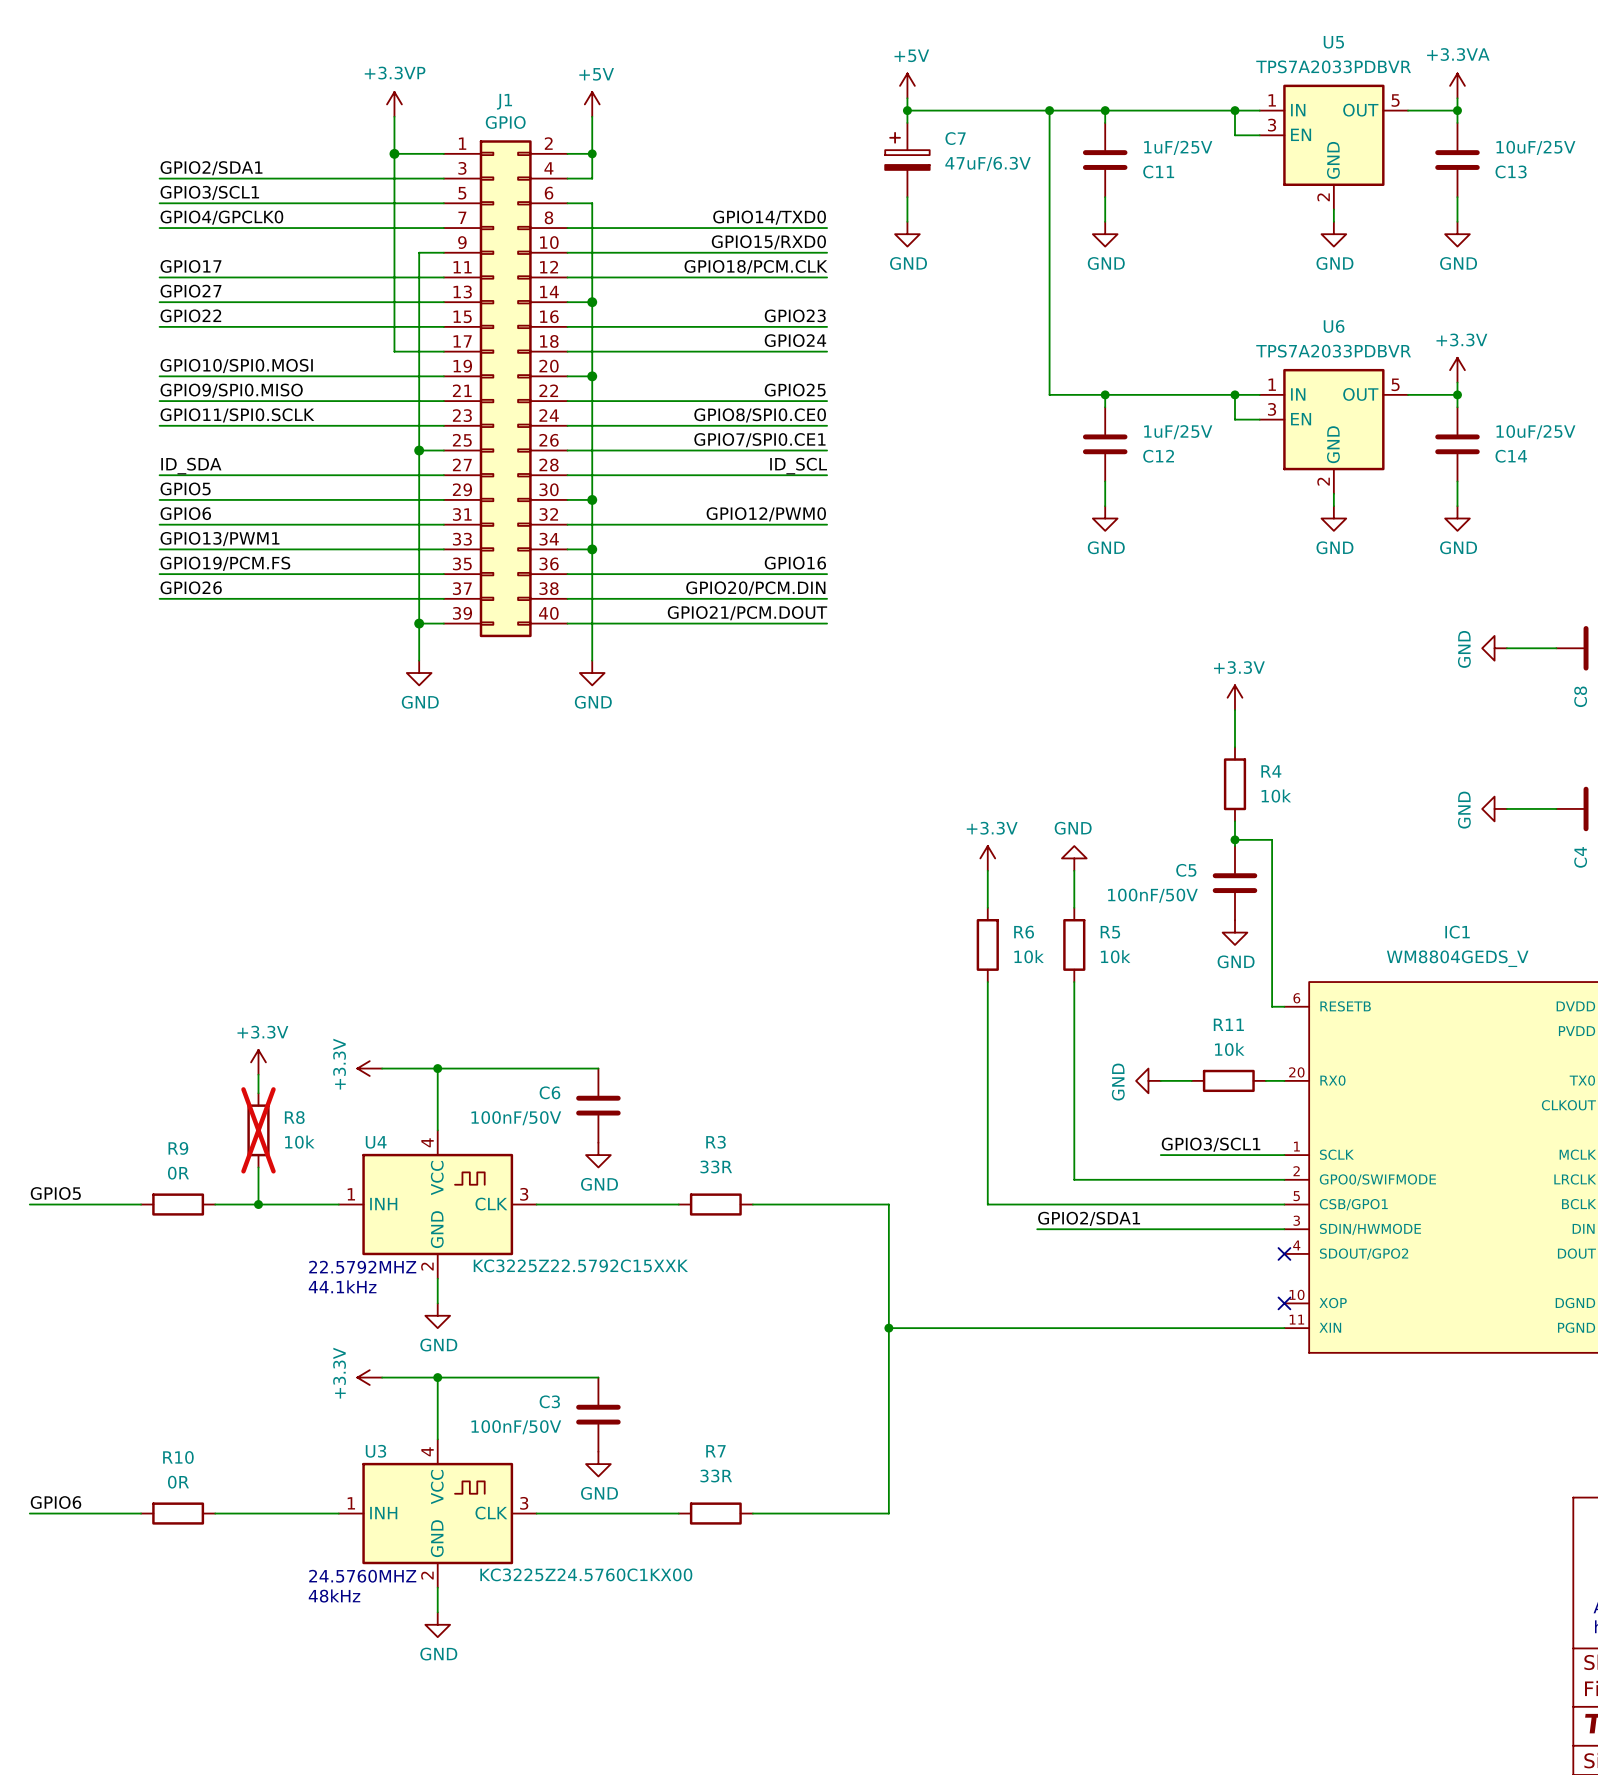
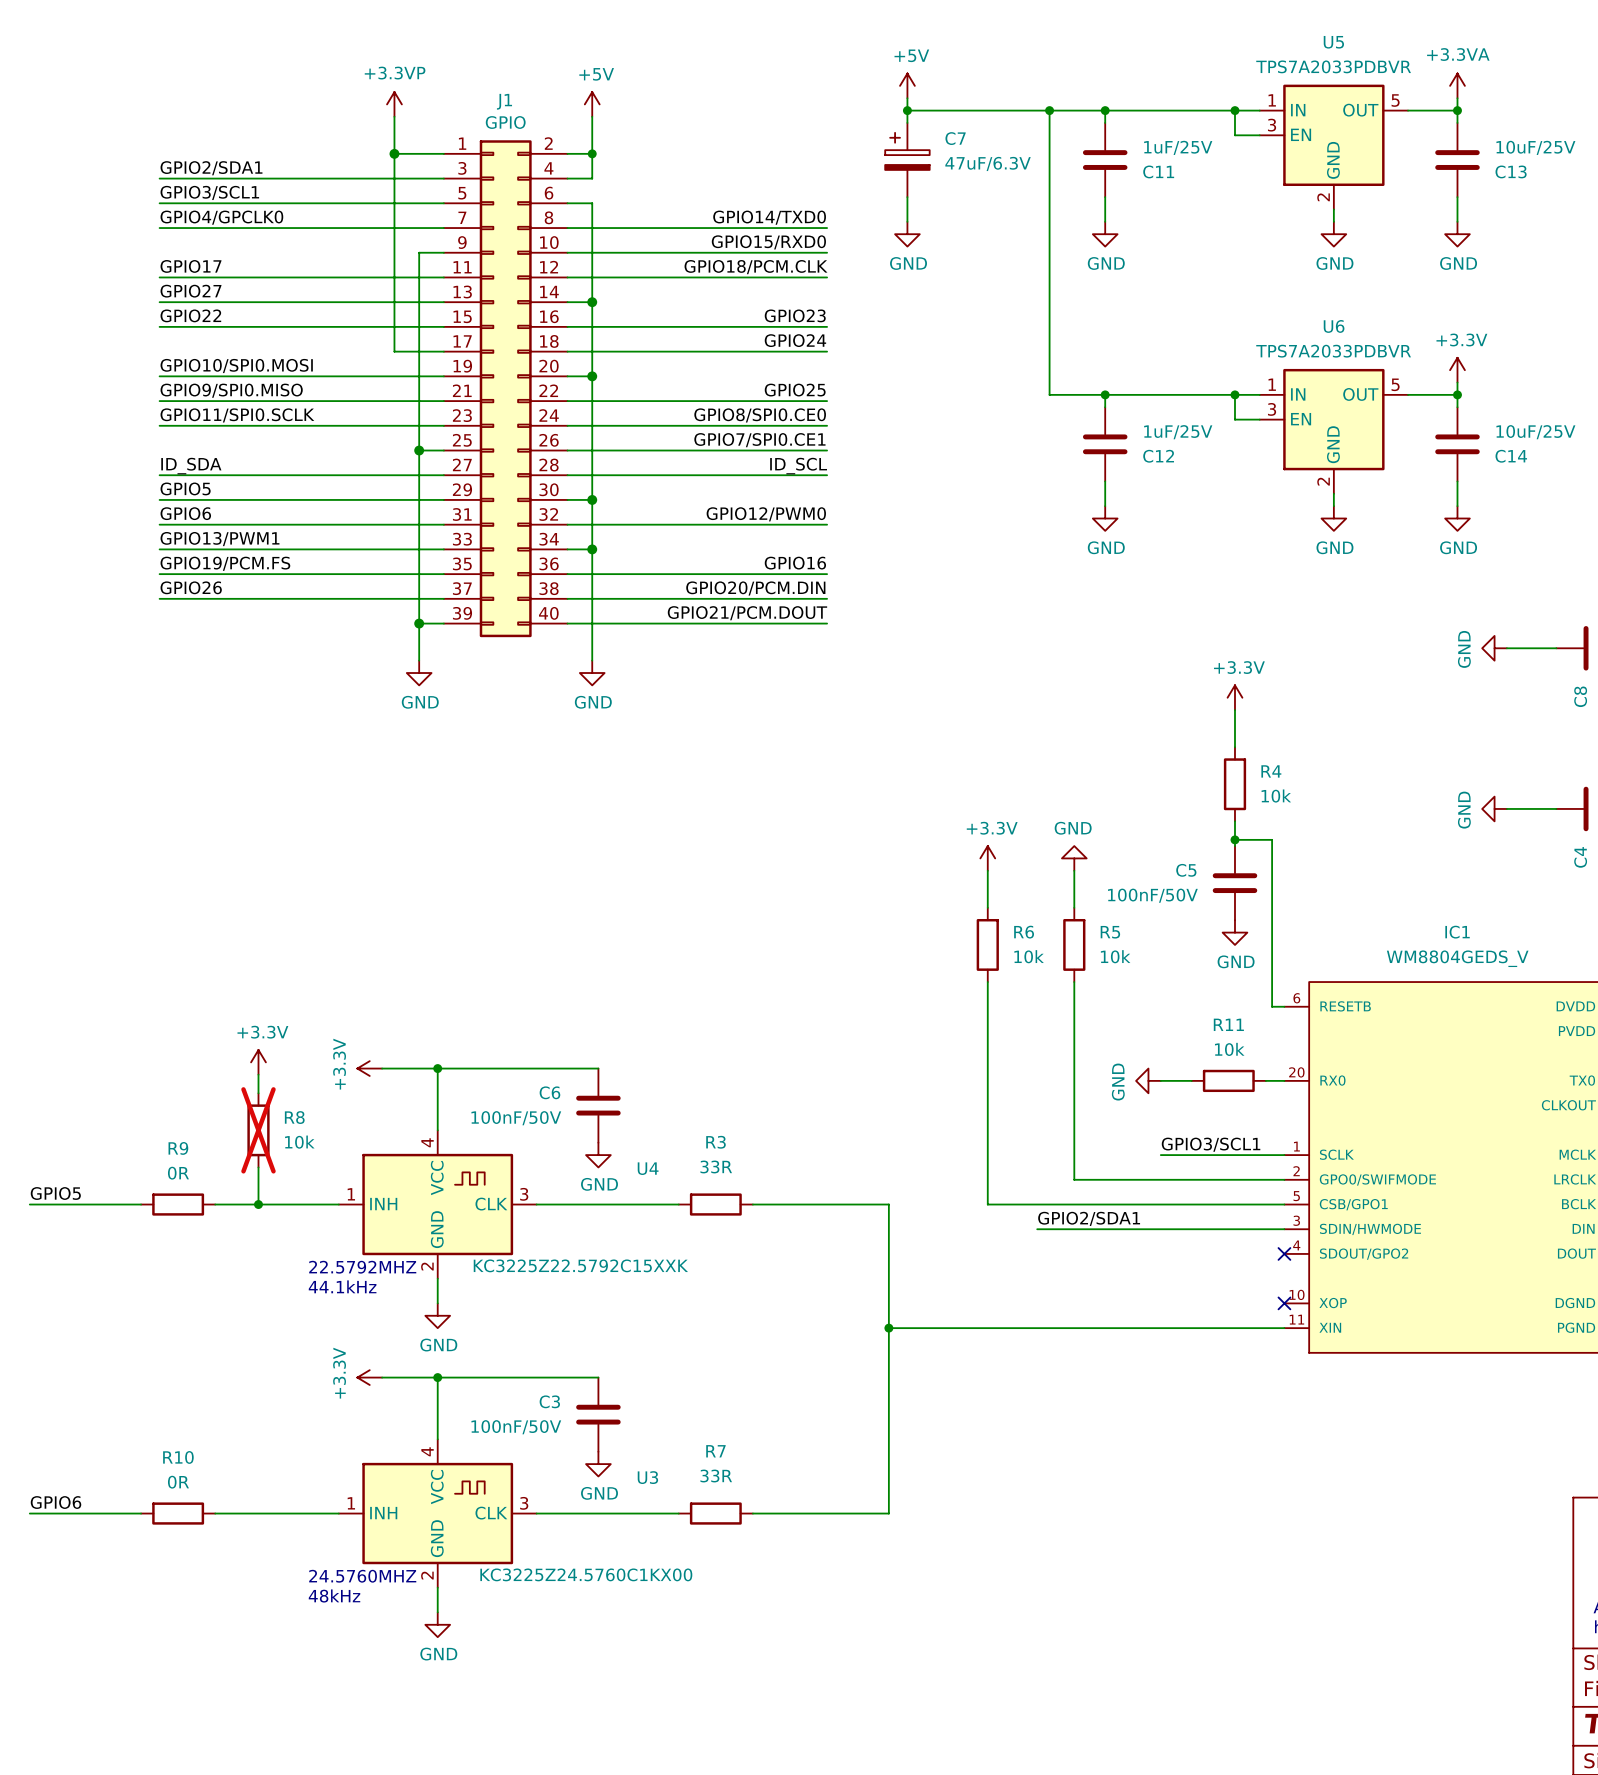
U4 name position: U4 (376, 1142) -> U4 (648, 1168)
U3 name position: U3 (375, 1451) -> U3 (647, 1477)

